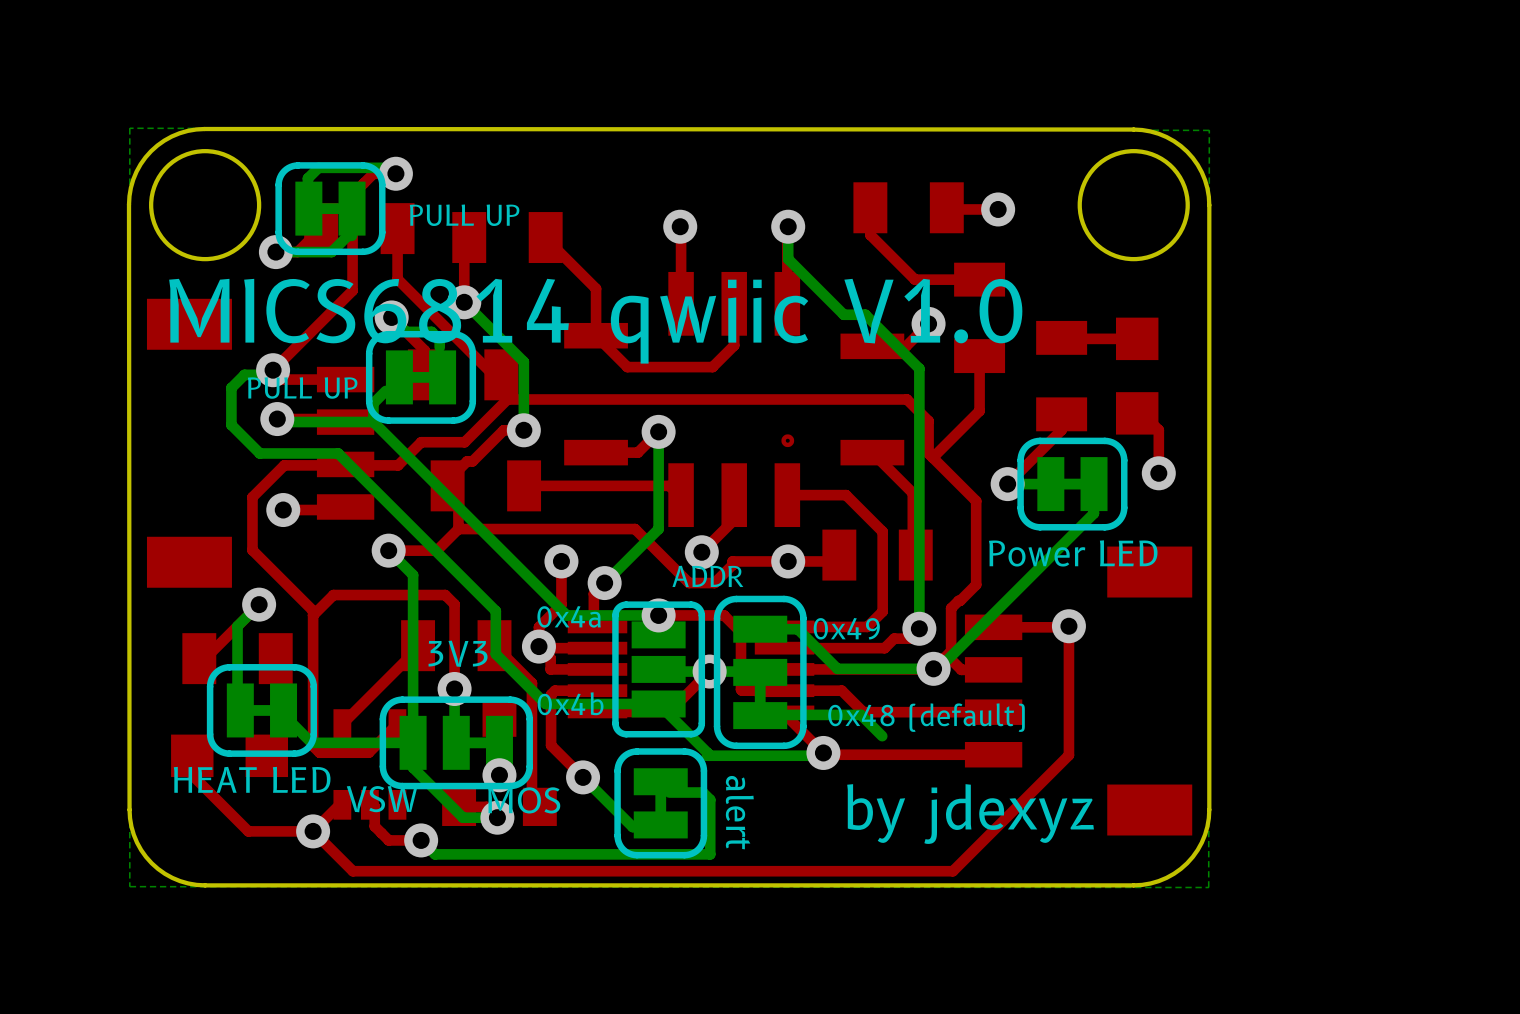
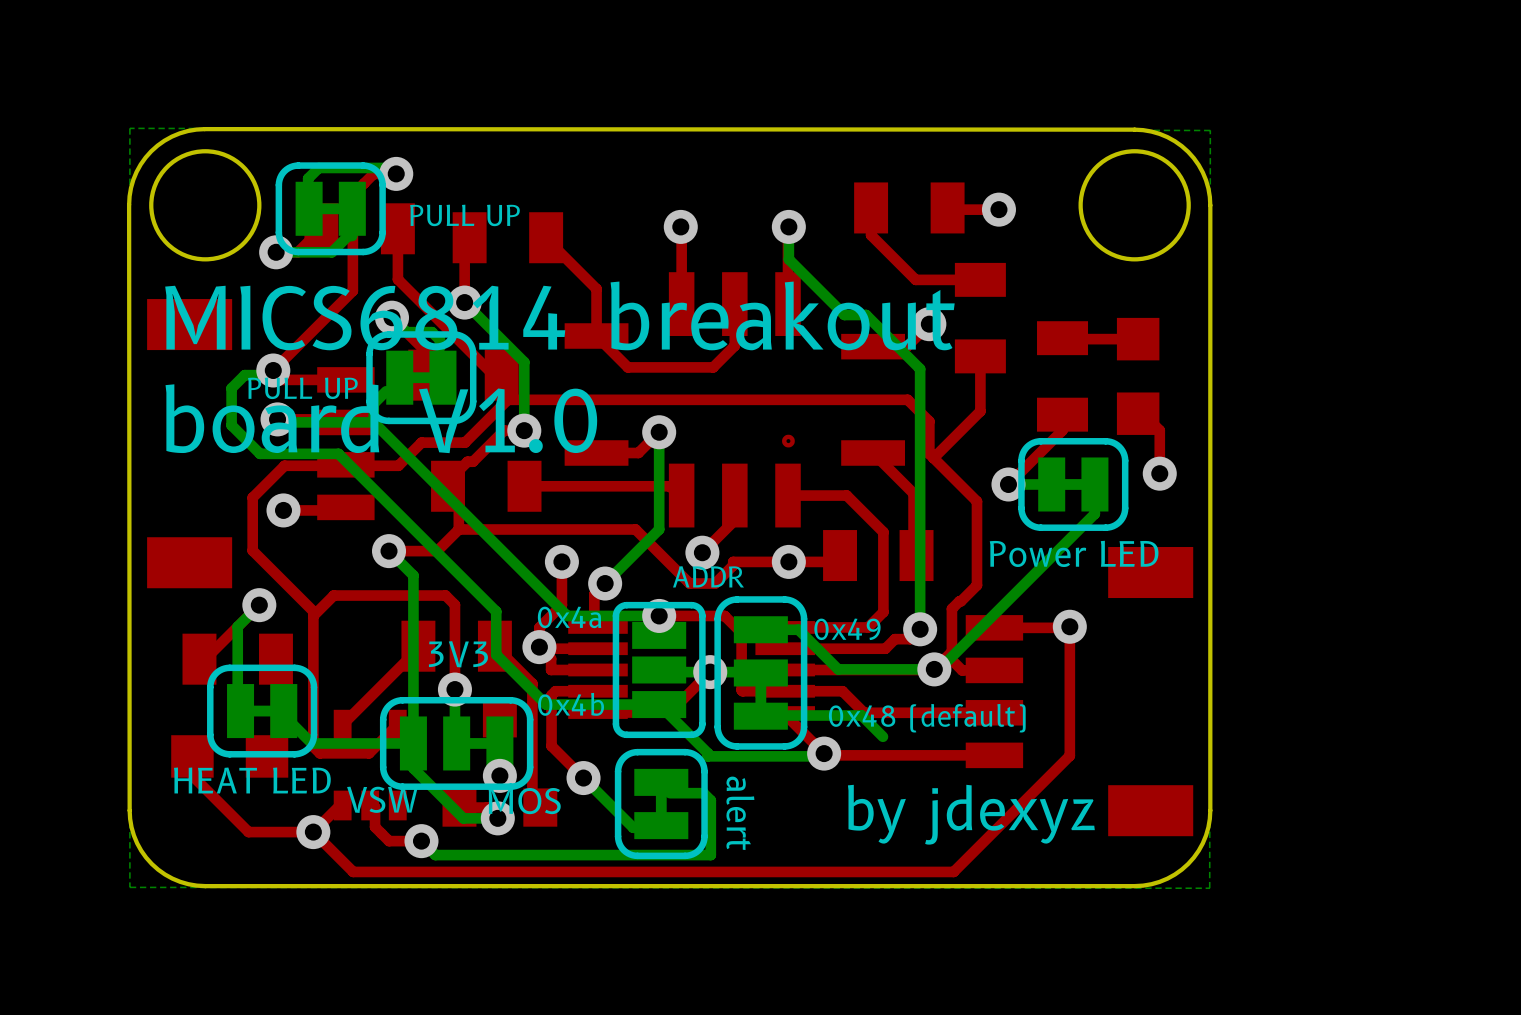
text: MICS6814 qwiic V1.0 (595, 321) -> MICS6814 breakout (559, 315)
text: none -> board V1.0 (381, 418)

